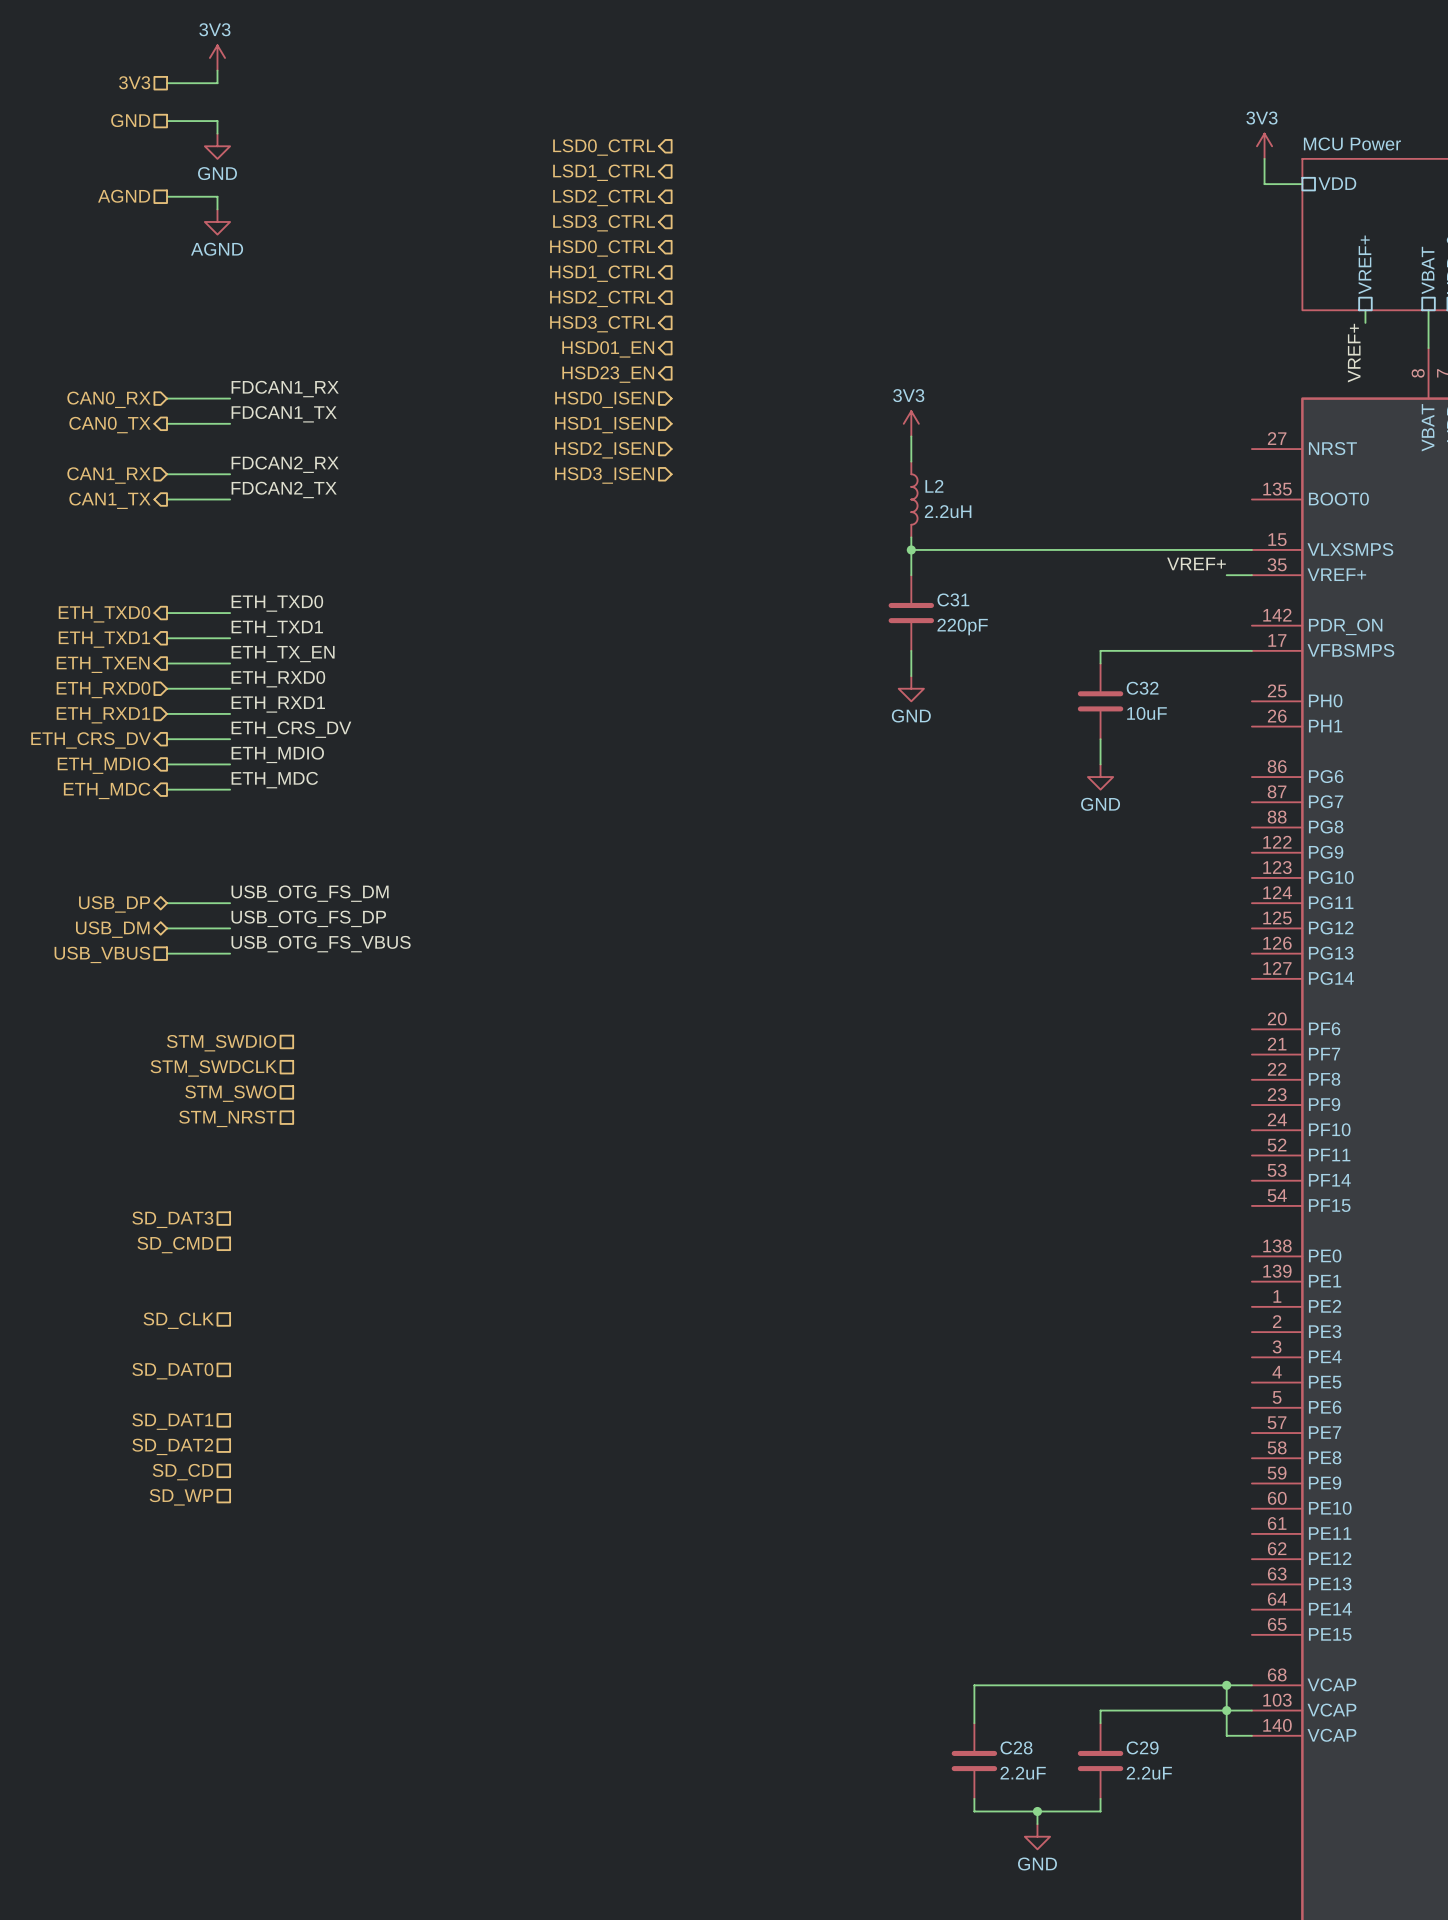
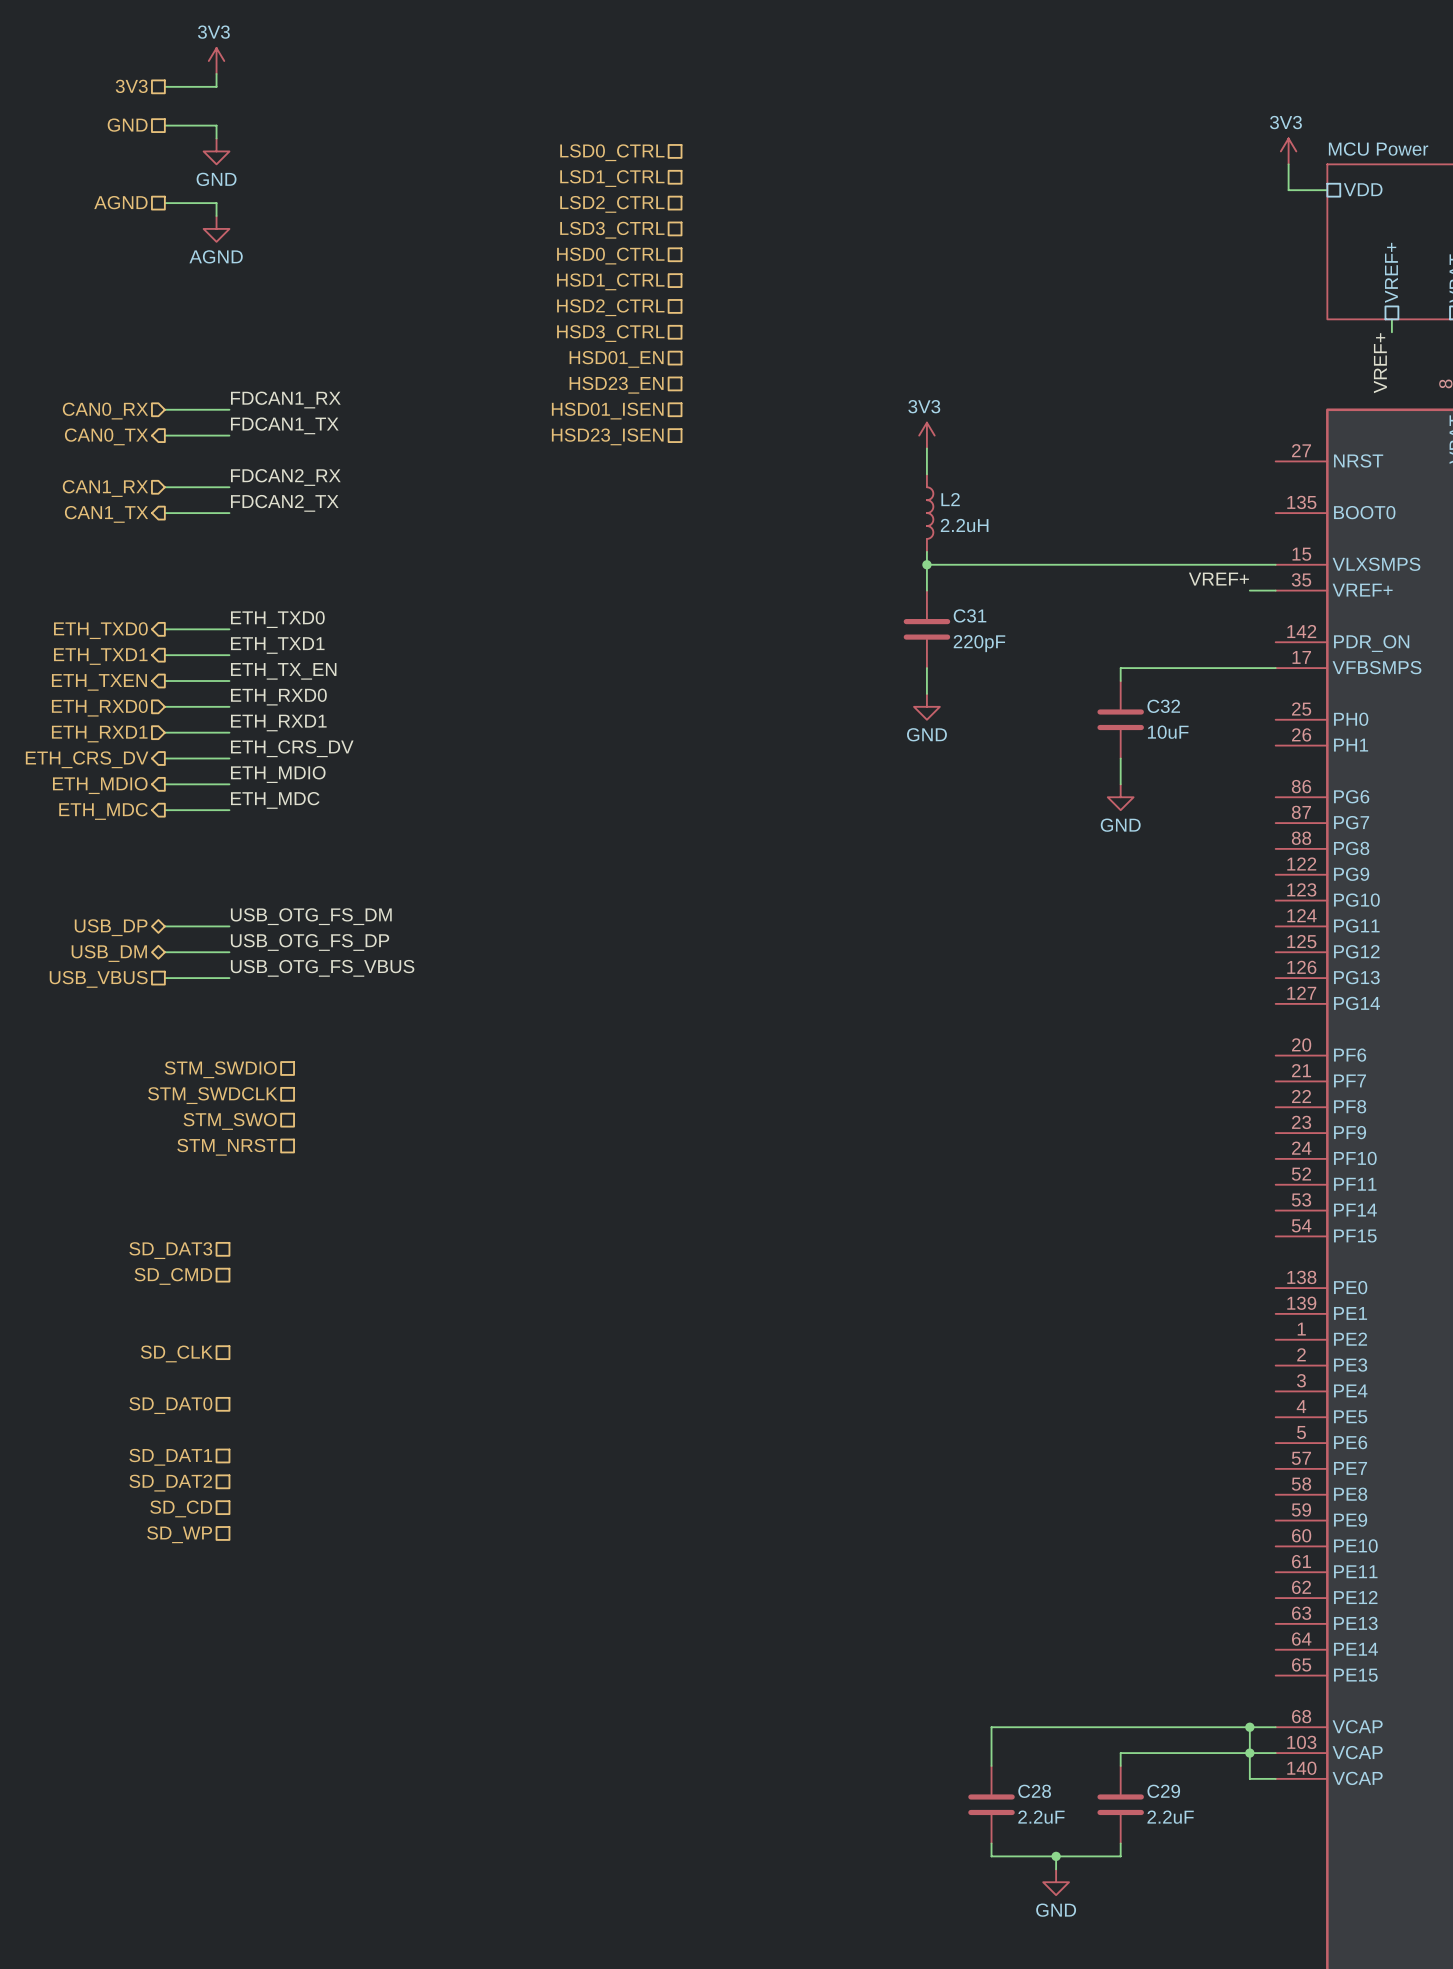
hierarchical label shape: output (604, 147) -> passive (612, 152)
hierarchical label shape: output (604, 172) -> passive (612, 178)
hierarchical label shape: output (604, 198) -> passive (612, 204)
hierarchical label shape: output (604, 223) -> passive (612, 230)
hierarchical label shape: output (602, 248) -> passive (610, 256)
hierarchical label shape: output (602, 273) -> passive (610, 281)
hierarchical label shape: output (602, 298) -> passive (610, 307)
hierarchical label shape: output (602, 324) -> passive (610, 333)
hierarchical label shape: output (608, 349) -> passive (616, 359)
hierarchical label shape: output (608, 374) -> passive (616, 385)
hierarchical label shape: input (604, 399) -> passive (607, 411)
hierarchical label: HSD0_ISEN (604, 399) -> HSD01_ISEN (607, 411)
hierarchical label shape: input (604, 425) -> passive (607, 436)
hierarchical label: HSD1_ISEN (604, 425) -> HSD23_ISEN (607, 436)
hierarchical label: HSD2_ISEN (604, 450) -> none
hierarchical label: HSD3_ISEN (604, 475) -> none

